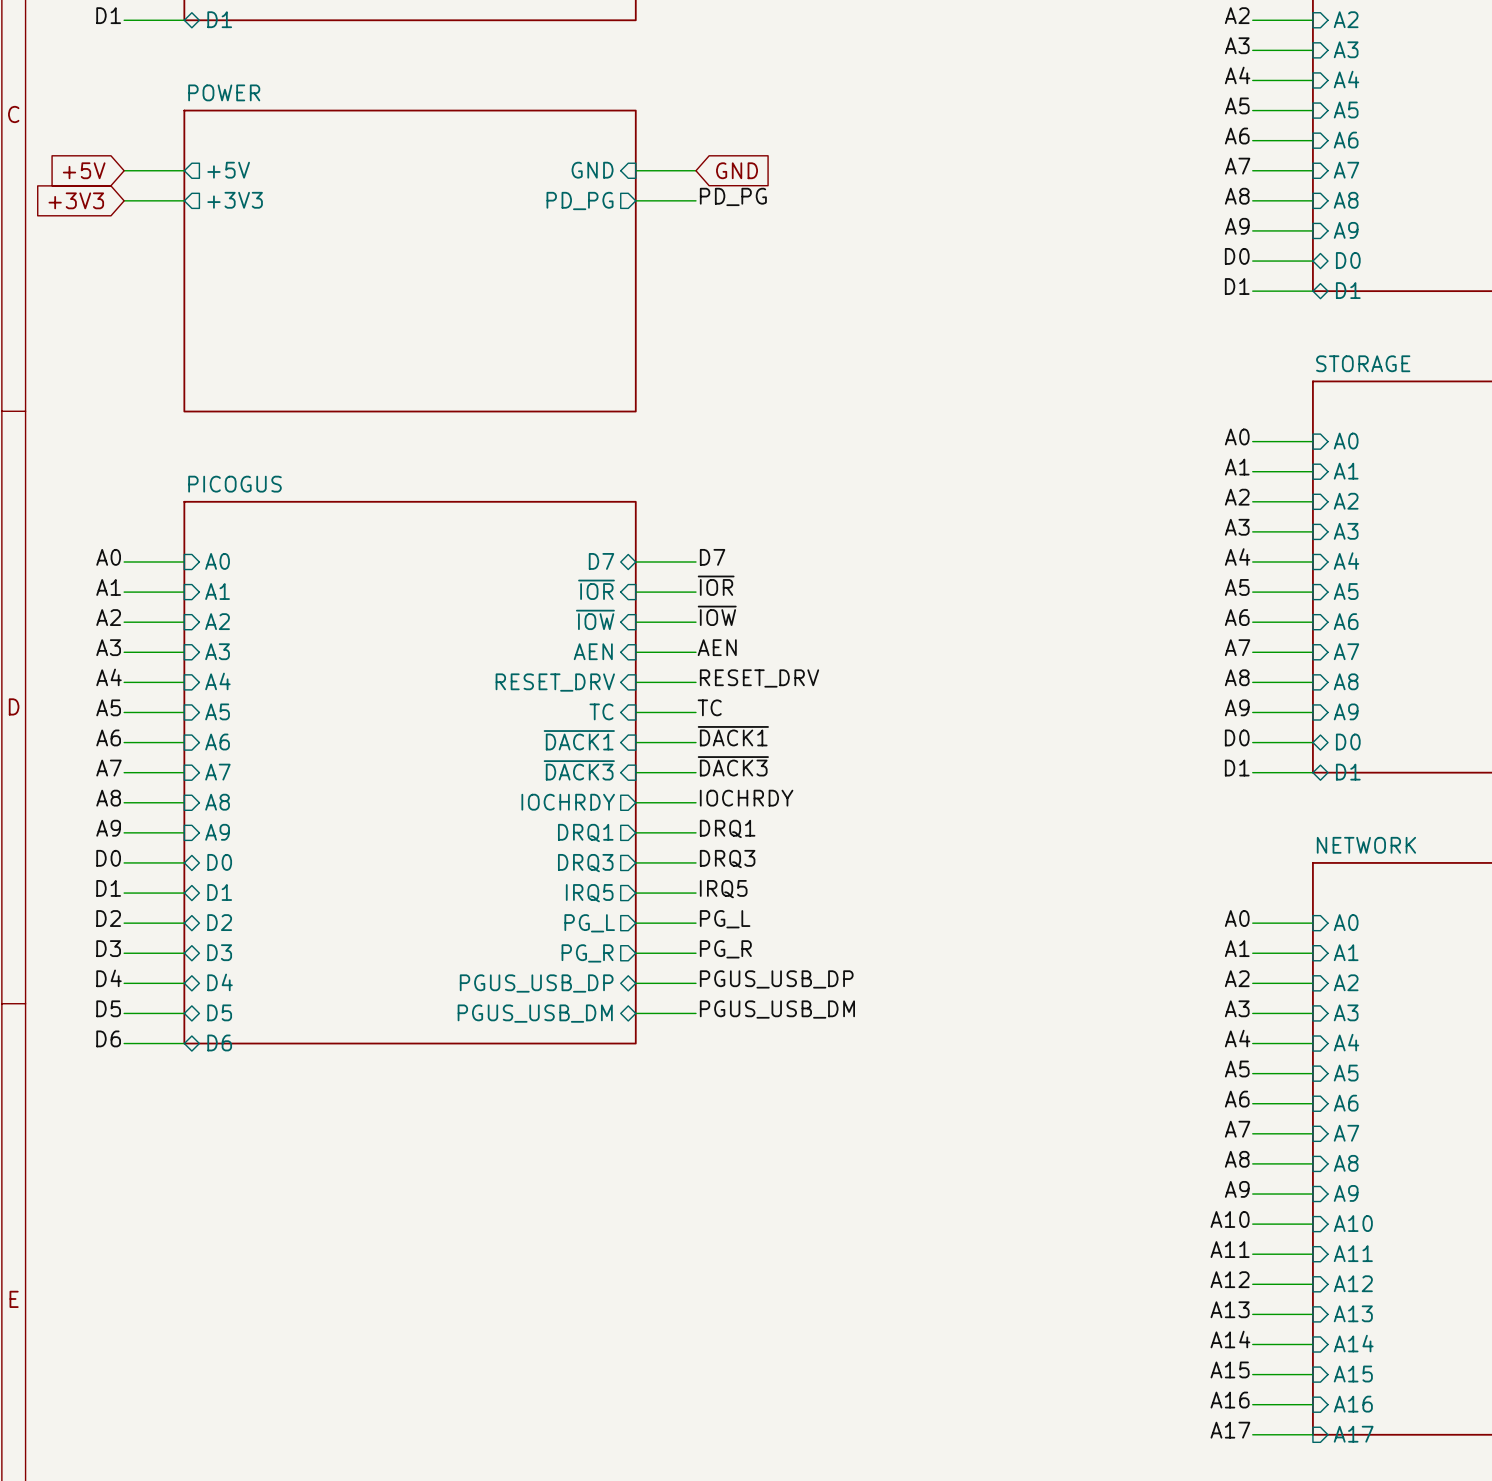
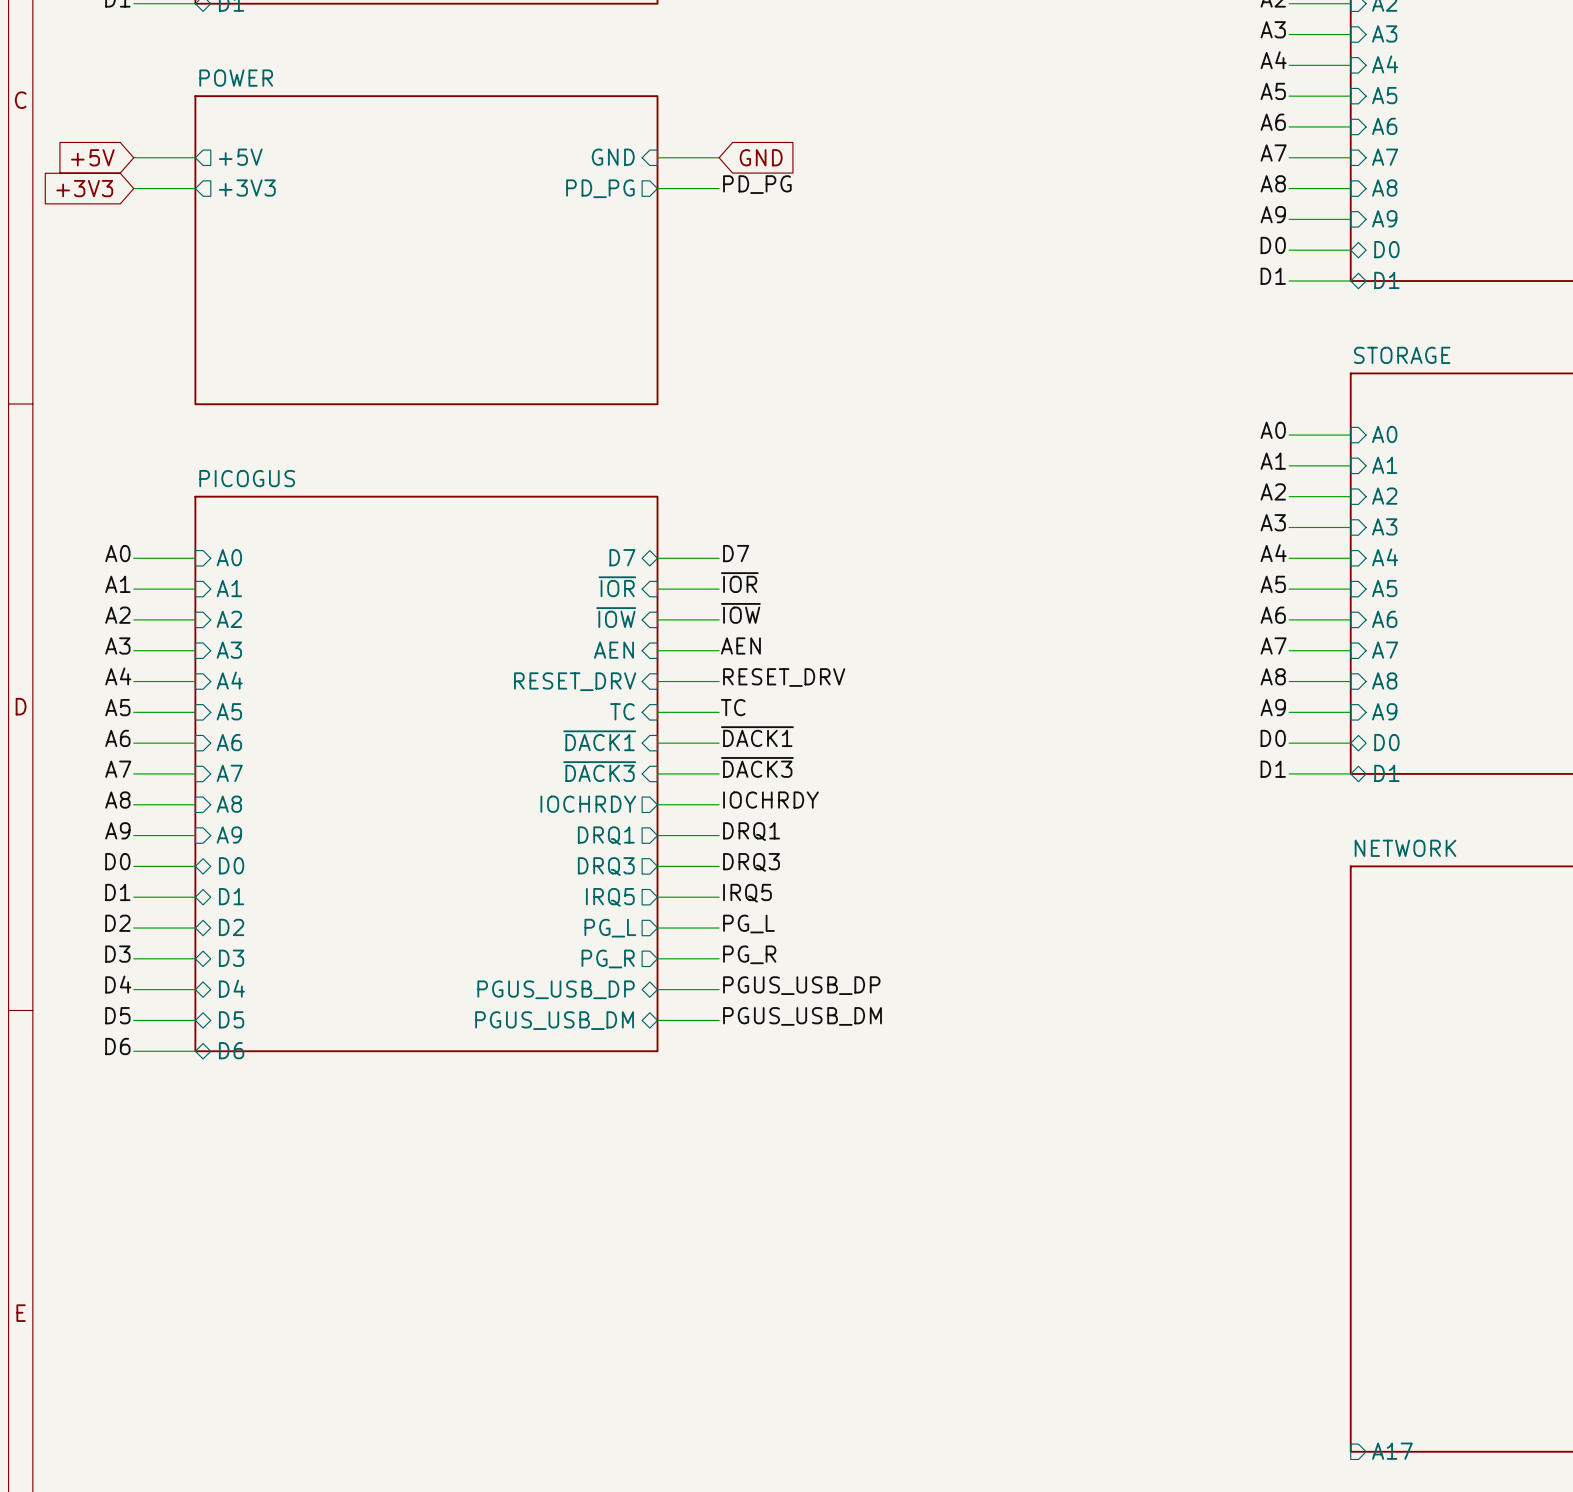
label: A0 (1237, 918) -> none
sheet pin: A0 (1346, 922) -> none
wire: (1252, 923) (1312, 923) -> none
label: A1 (1237, 948) -> none
sheet pin: A1 (1346, 952) -> none
wire: (1252, 953) (1312, 953) -> none
label: A2 (1237, 978) -> none
sheet pin: A2 (1346, 982) -> none
wire: (1252, 983) (1312, 983) -> none
label: A3 (1237, 1008) -> none
sheet pin: A3 (1346, 1012) -> none
wire: (1252, 1013) (1312, 1013) -> none
label: A4 (1237, 1038) -> none
sheet pin: A4 (1346, 1042) -> none
wire: (1252, 1043) (1312, 1043) -> none
label: A5 (1237, 1069) -> none
wire: (1252, 1073) (1312, 1073) -> none
sheet pin: A5 (1346, 1073) -> none
label: A6 (1237, 1099) -> none
wire: (1252, 1103) (1312, 1103) -> none
sheet pin: A6 (1346, 1103) -> none
label: A7 (1237, 1129) -> none
wire: (1252, 1133) (1312, 1133) -> none
sheet pin: A7 (1346, 1133) -> none
label: A8 (1237, 1159) -> none
wire: (1252, 1163) (1312, 1163) -> none
sheet pin: A8 (1346, 1163) -> none
label: A9 (1237, 1189) -> none
sheet pin: A9 (1346, 1193) -> none
wire: (1252, 1194) (1312, 1194) -> none
label: A10 (1230, 1219) -> none
sheet pin: A10 (1353, 1223) -> none
wire: (1252, 1224) (1312, 1224) -> none
label: A11 (1230, 1249) -> none
sheet pin: A11 (1353, 1253) -> none
wire: (1252, 1254) (1312, 1254) -> none
label: A12 (1230, 1279) -> none
sheet pin: A12 (1353, 1283) -> none
wire: (1252, 1284) (1312, 1284) -> none
label: A13 (1230, 1309) -> none
sheet pin: A13 (1353, 1313) -> none
wire: (1252, 1314) (1312, 1314) -> none
label: A14 (1230, 1339) -> none
sheet pin: A14 (1353, 1343) -> none
wire: (1252, 1344) (1312, 1344) -> none
label: A15 (1230, 1369) -> none
wire: (1252, 1374) (1312, 1374) -> none
sheet pin: A15 (1353, 1374) -> none
label: A16 (1230, 1400) -> none
wire: (1252, 1404) (1312, 1404) -> none
sheet pin: A16 (1353, 1404) -> none
label: A17 (1230, 1430) -> none
wire: (1252, 1434) (1312, 1434) -> none

